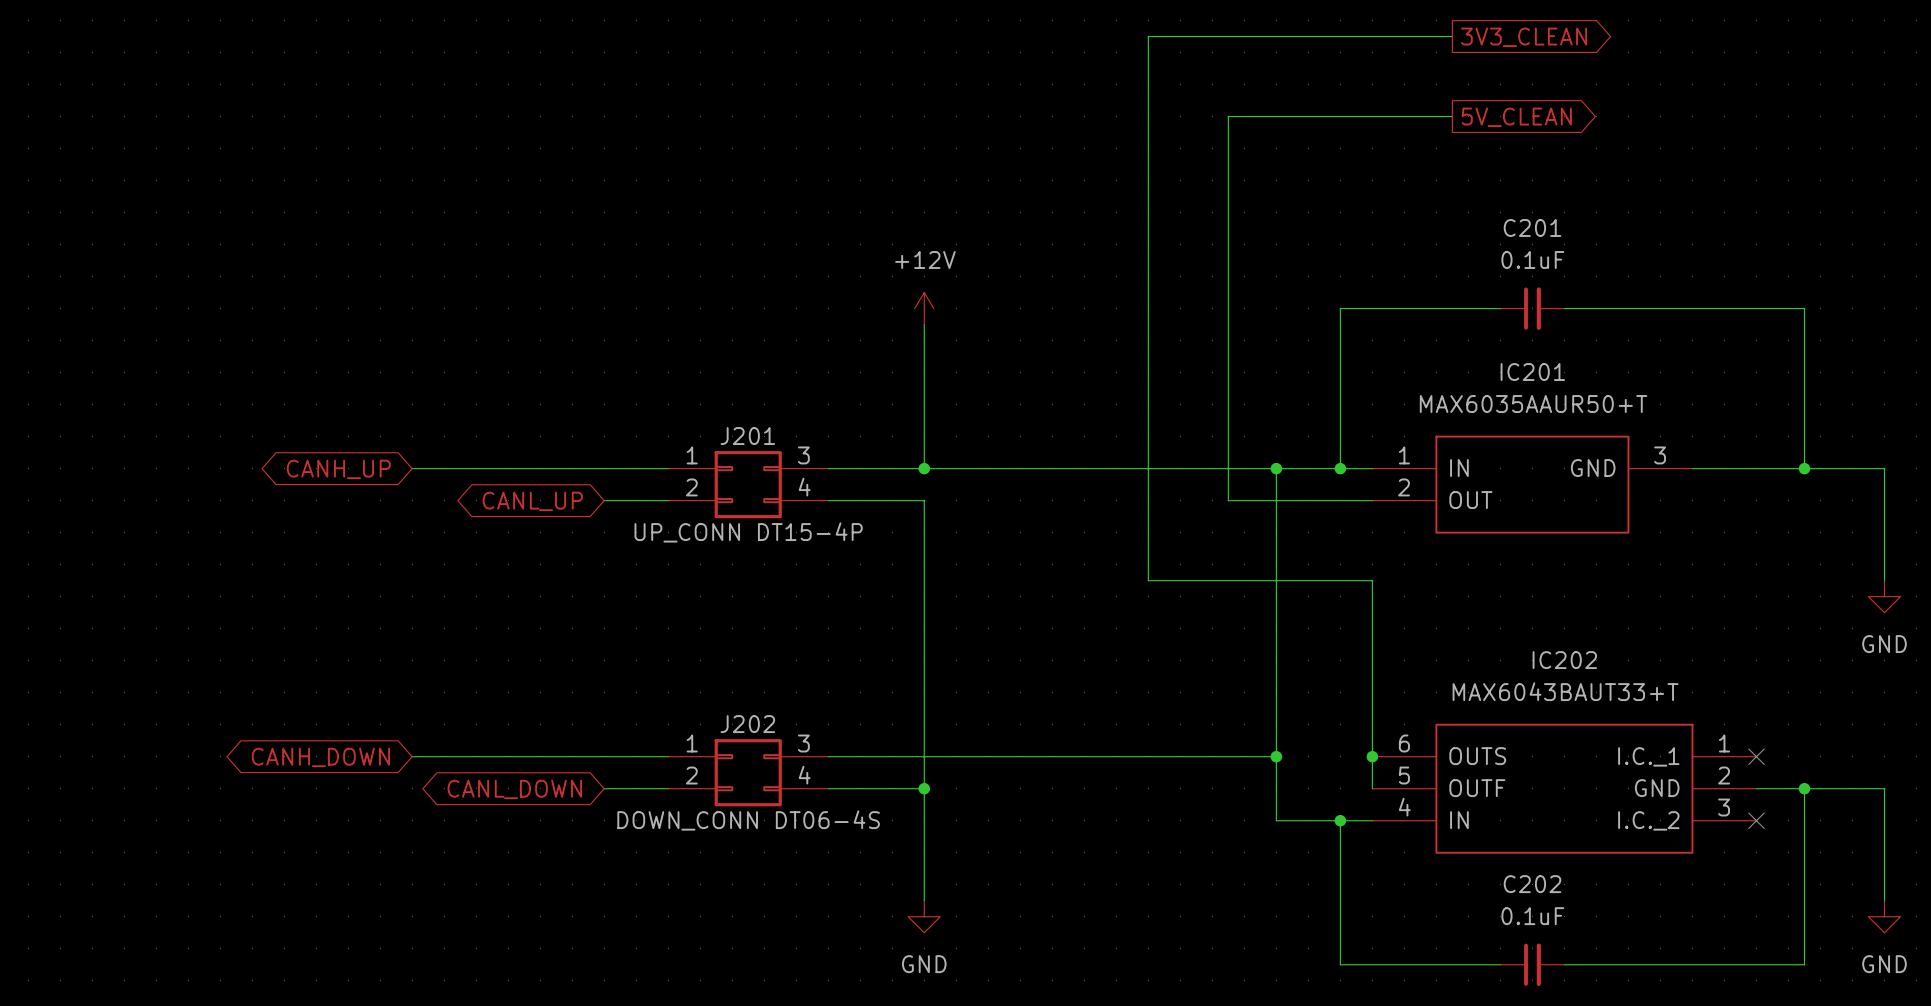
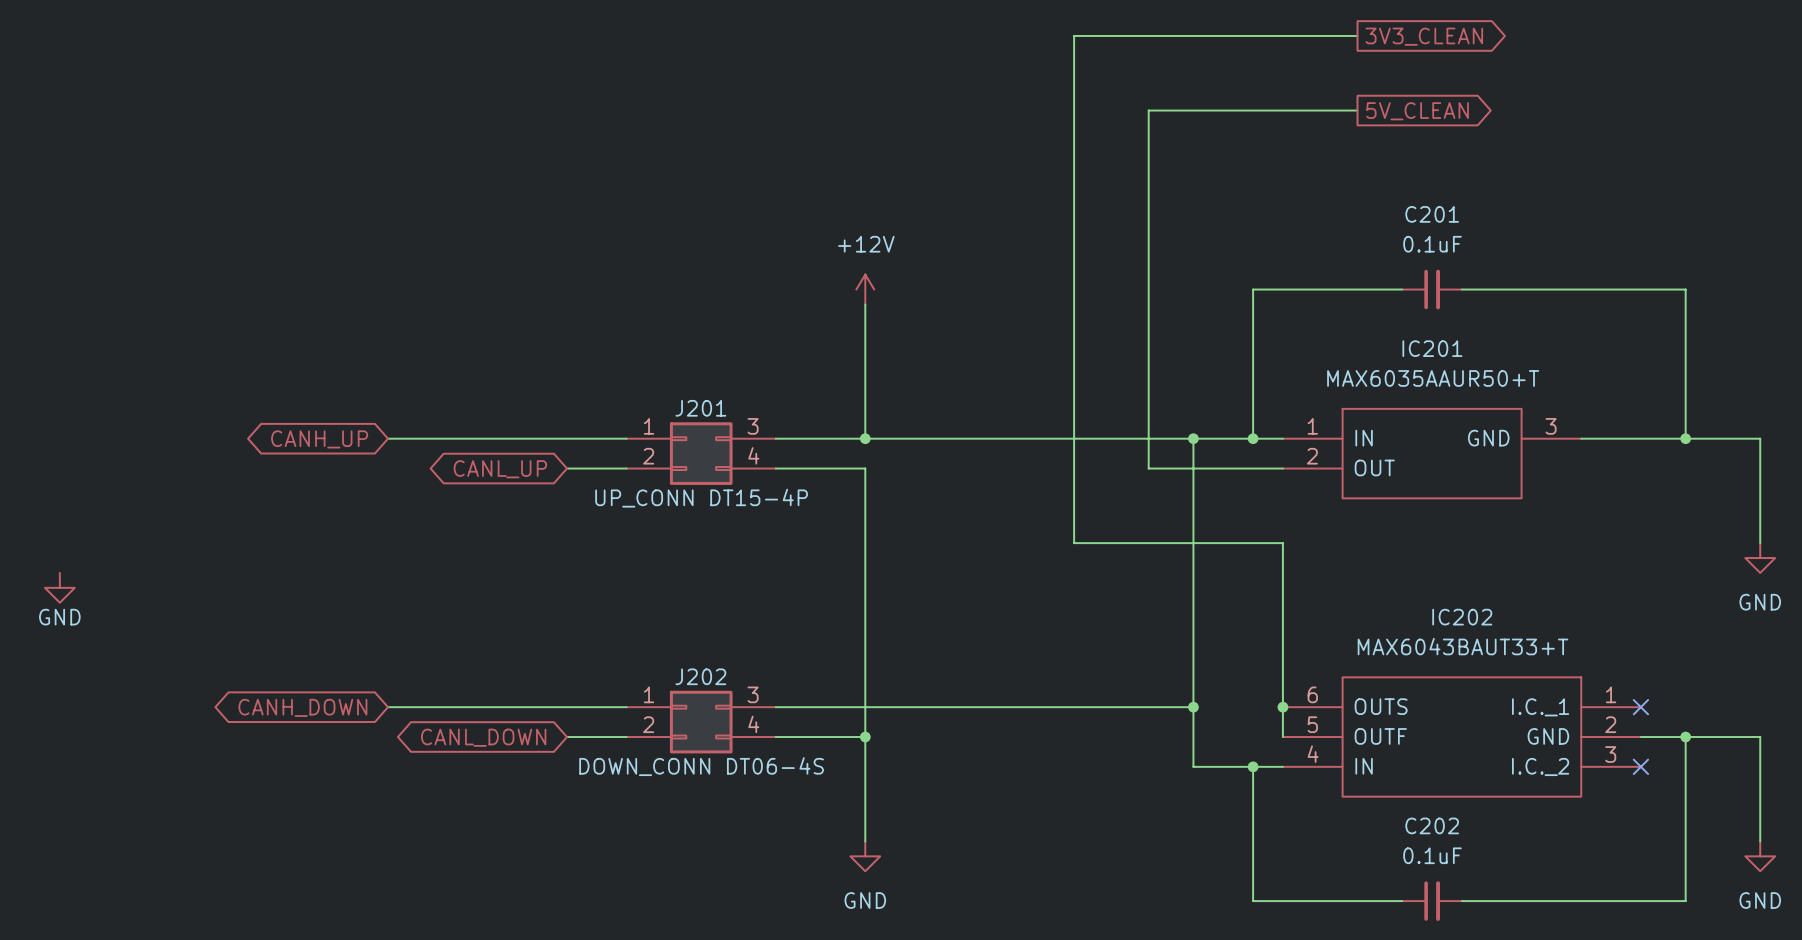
power symbol: none -> GND (59, 587)

